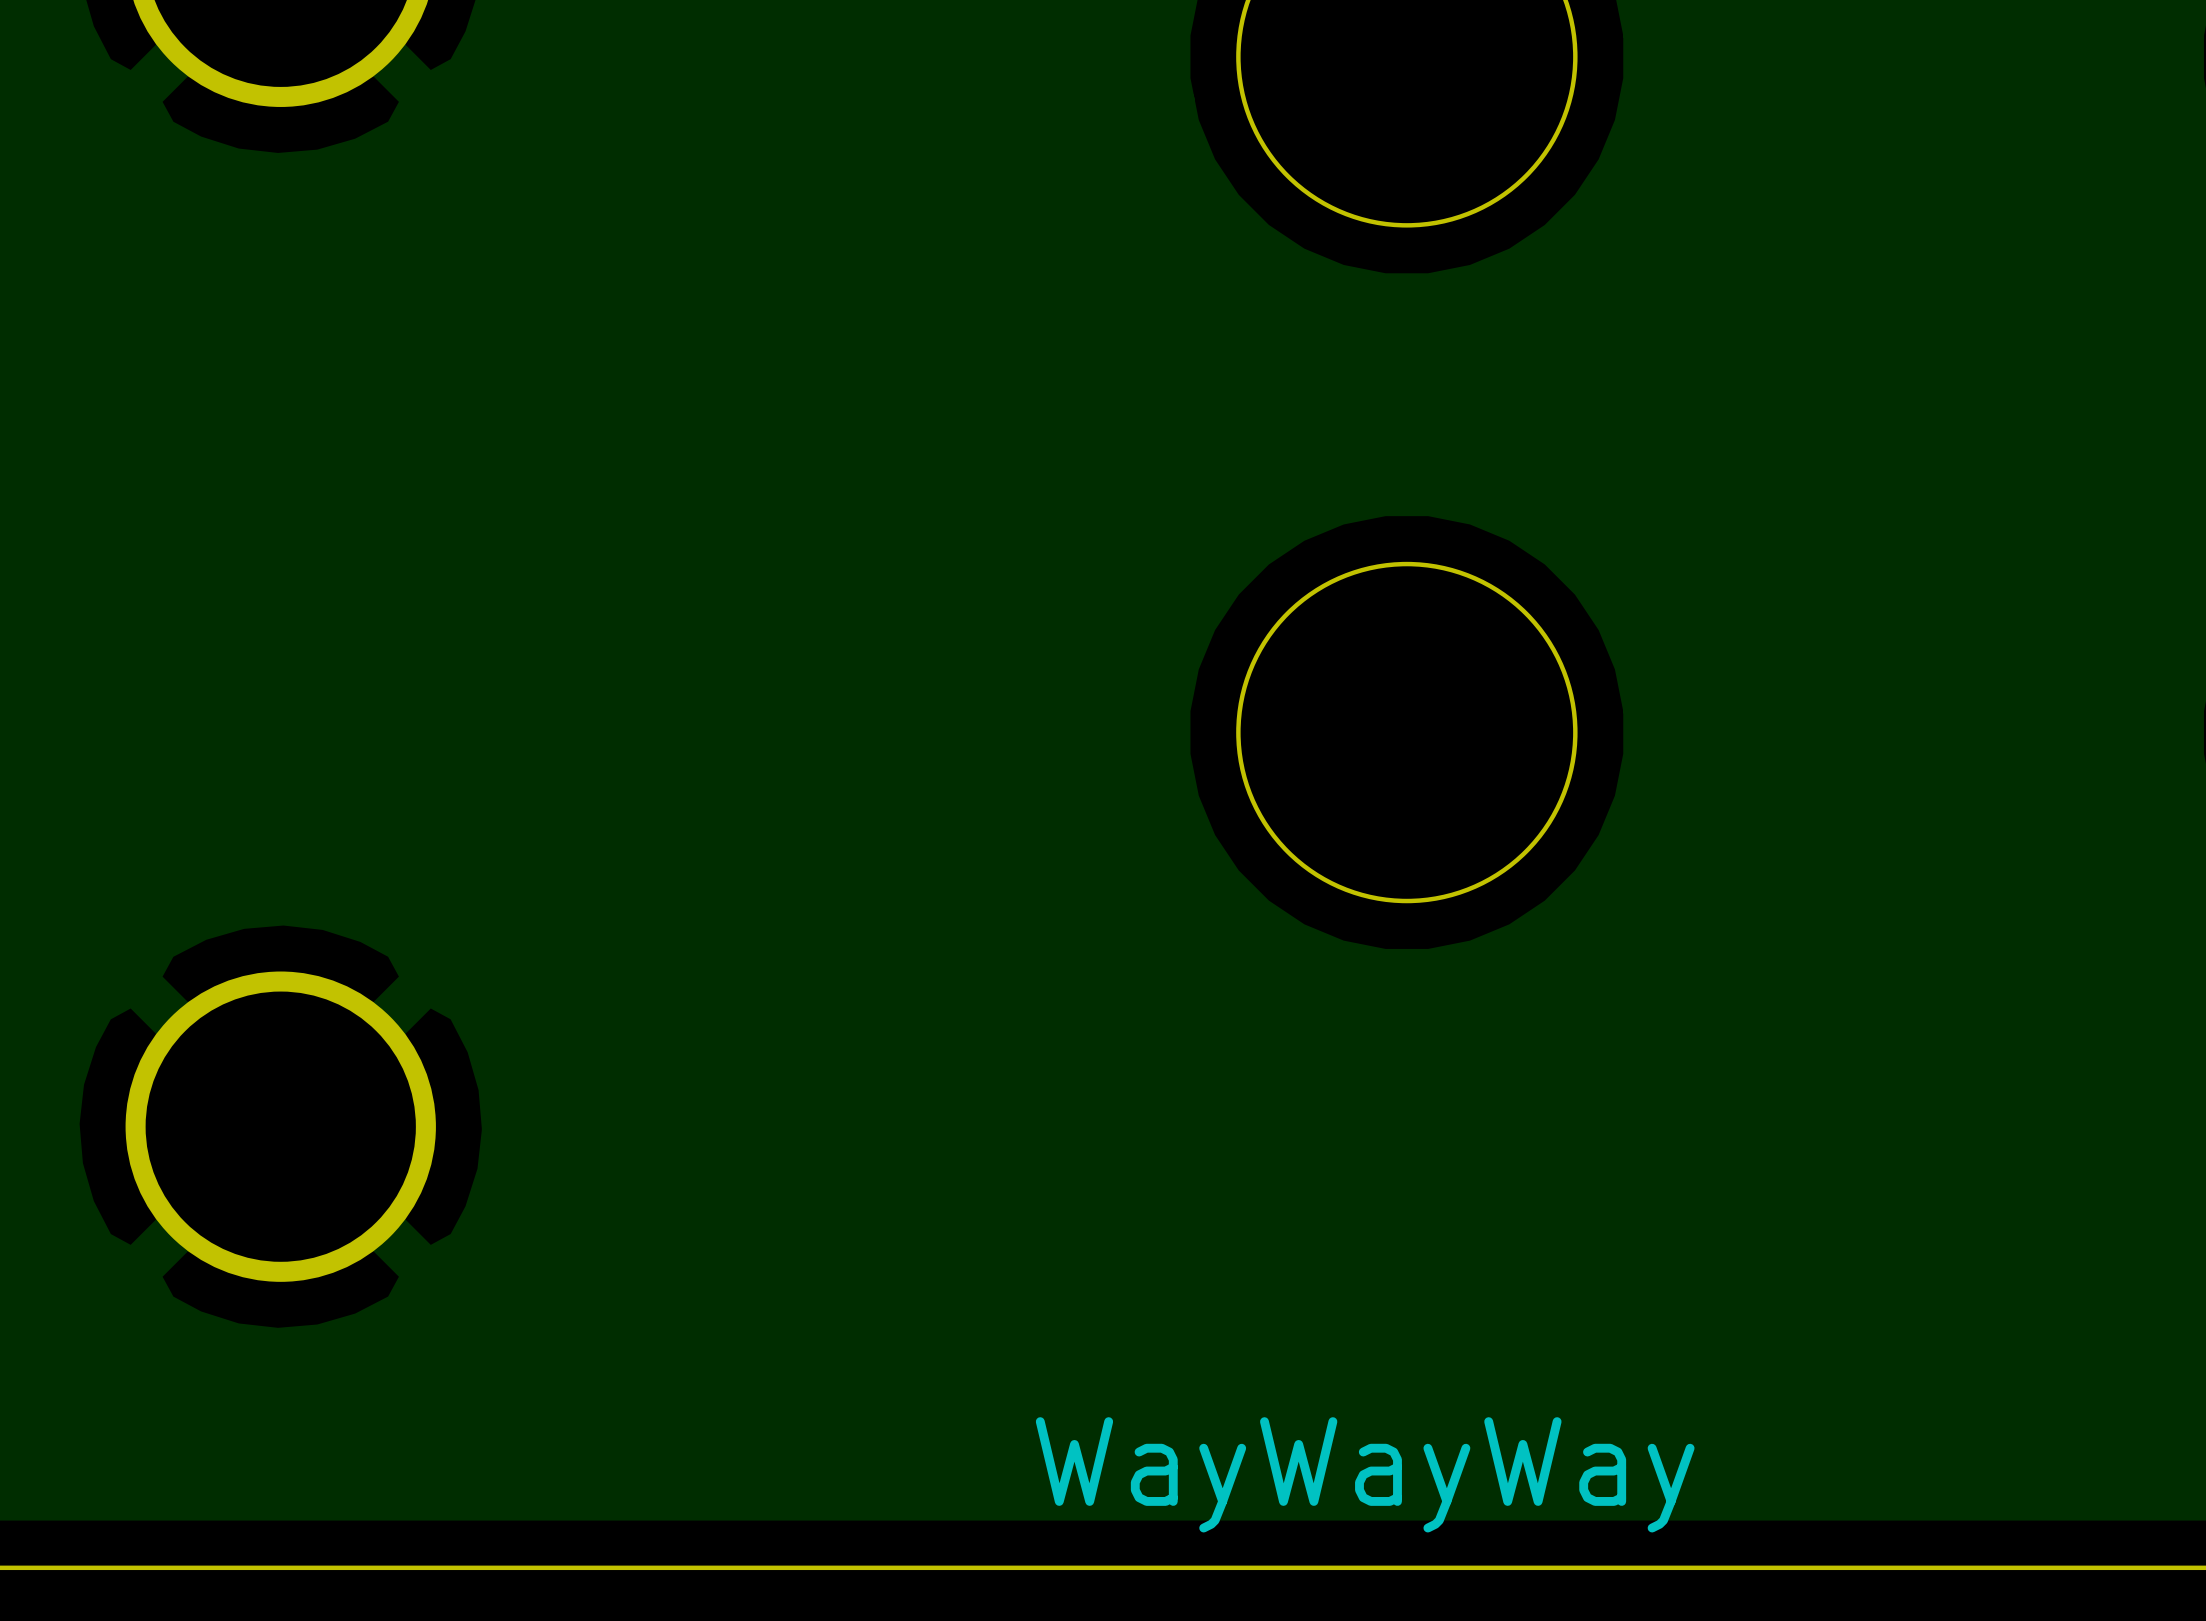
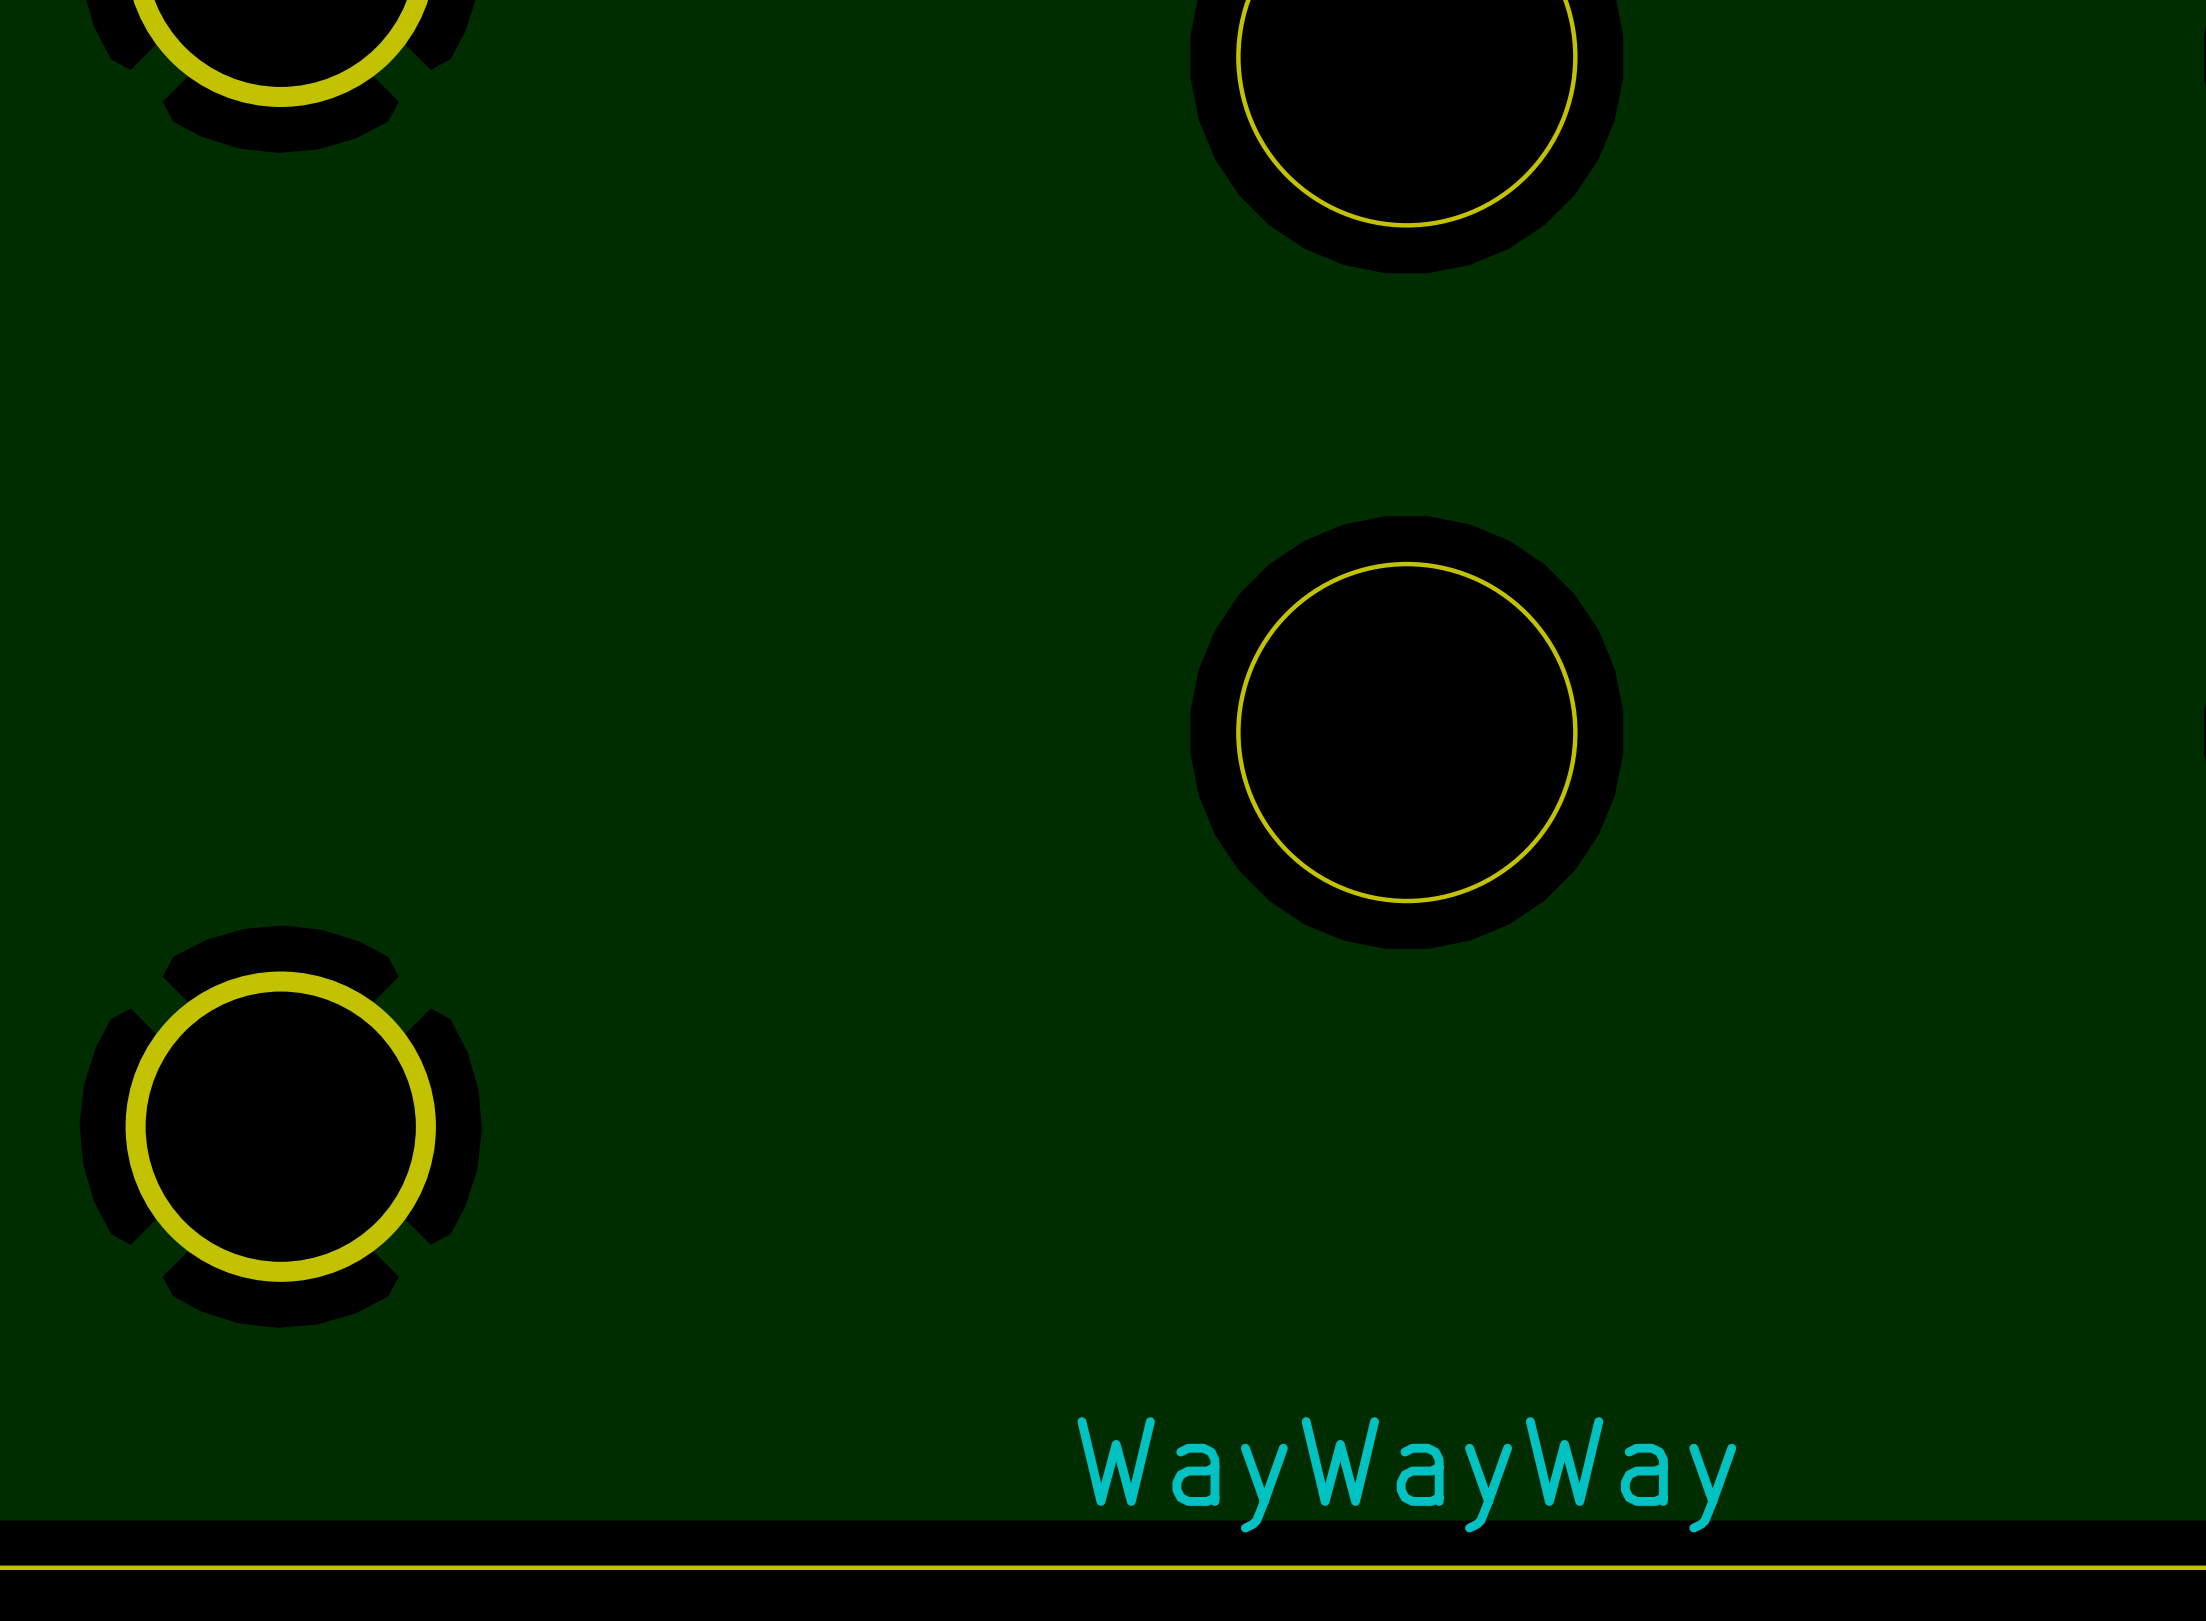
text position: WayWayWay (1365, 1474) -> WayWayWay (1406, 1474)

